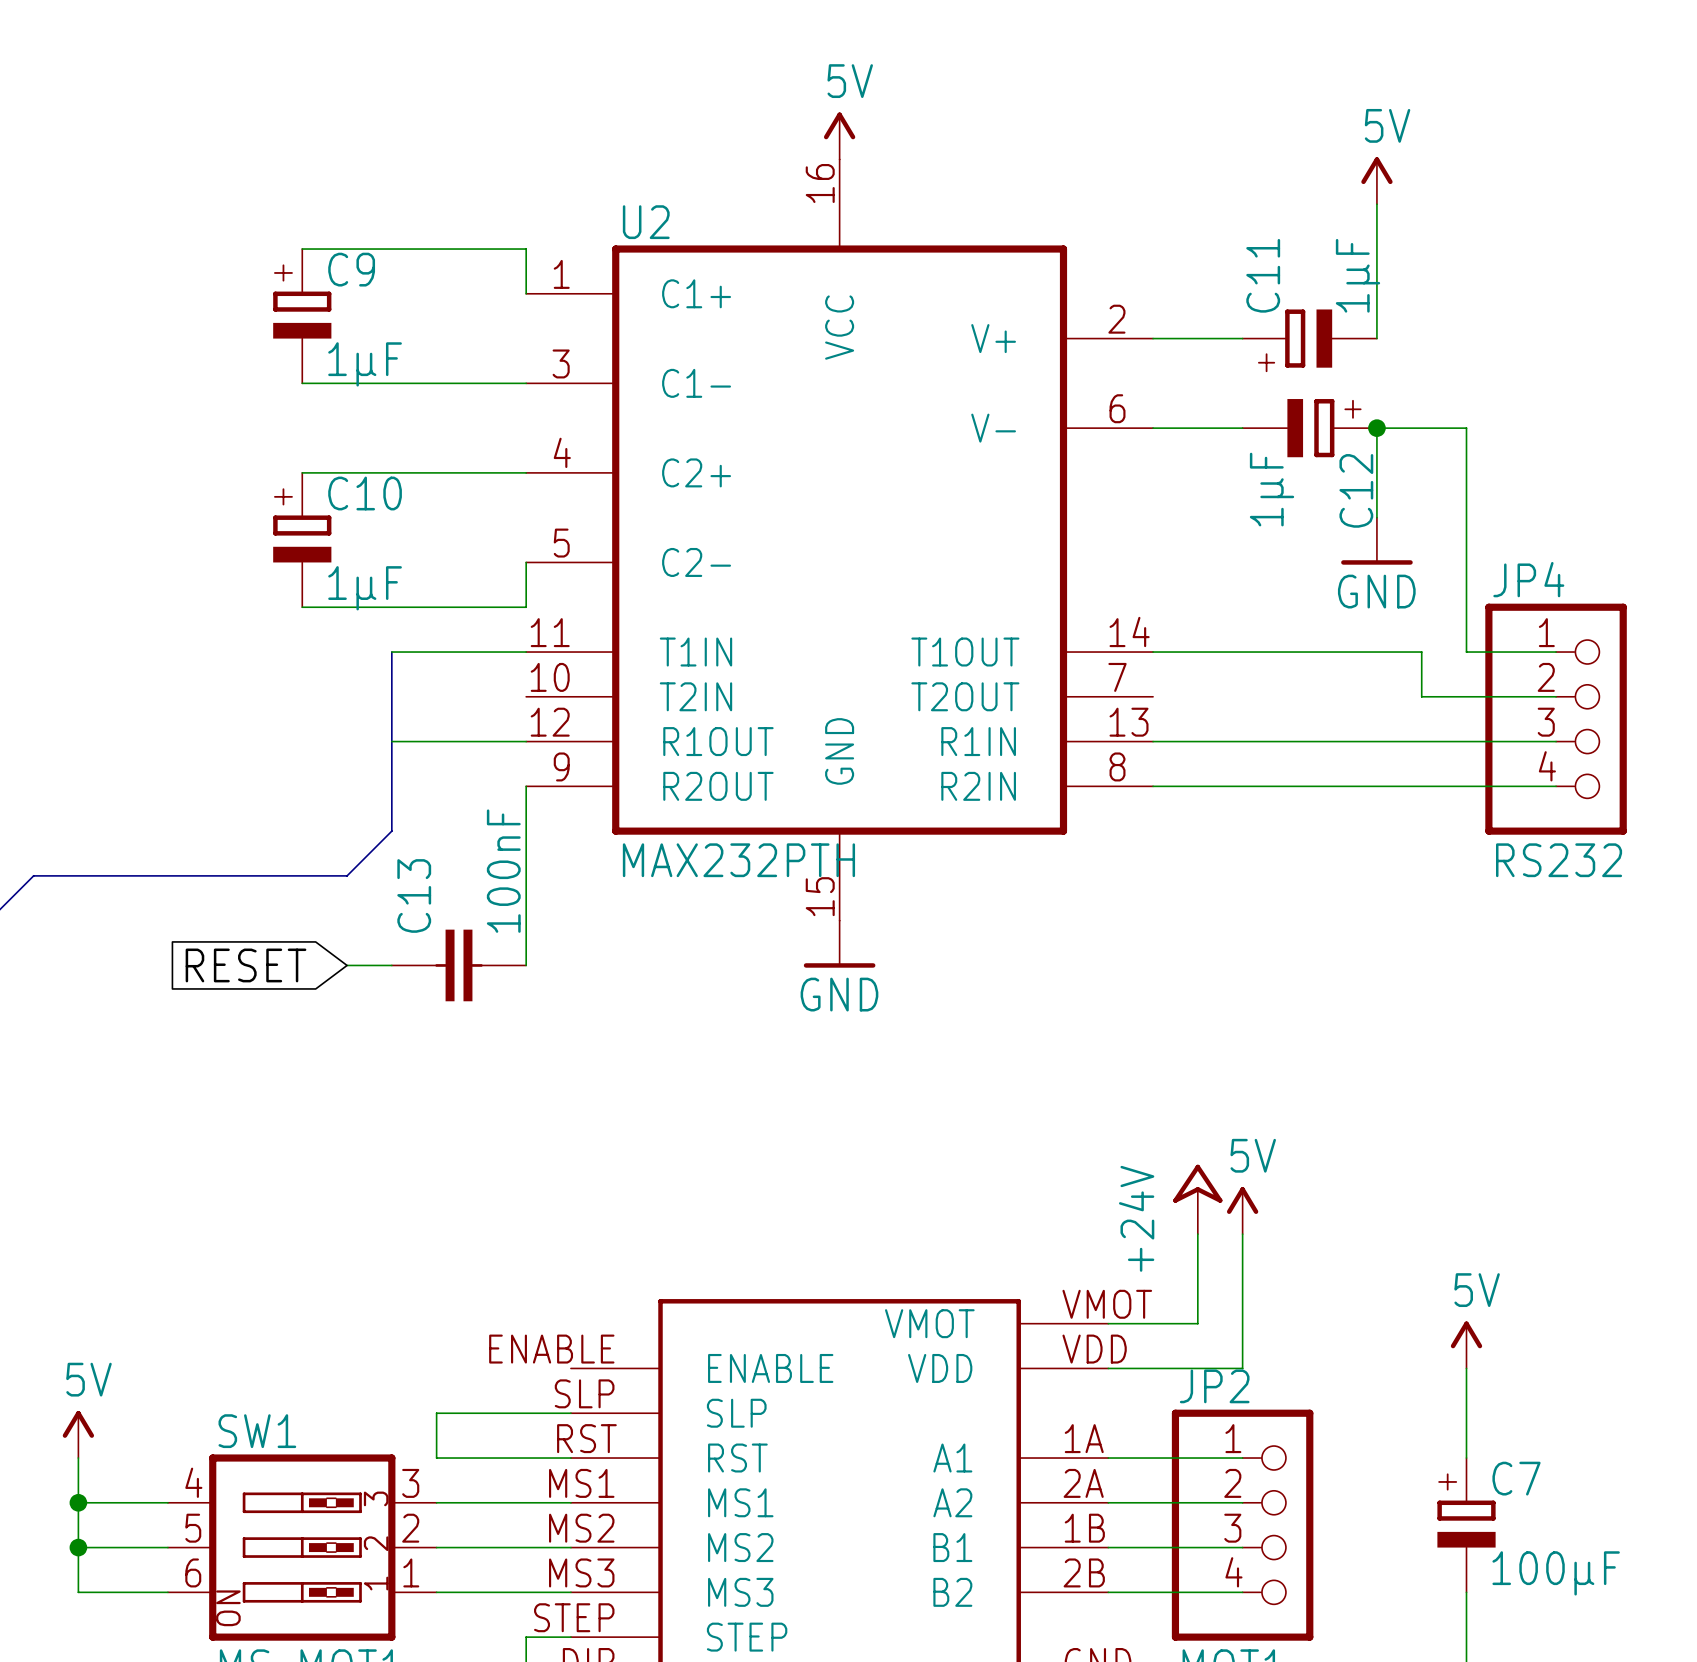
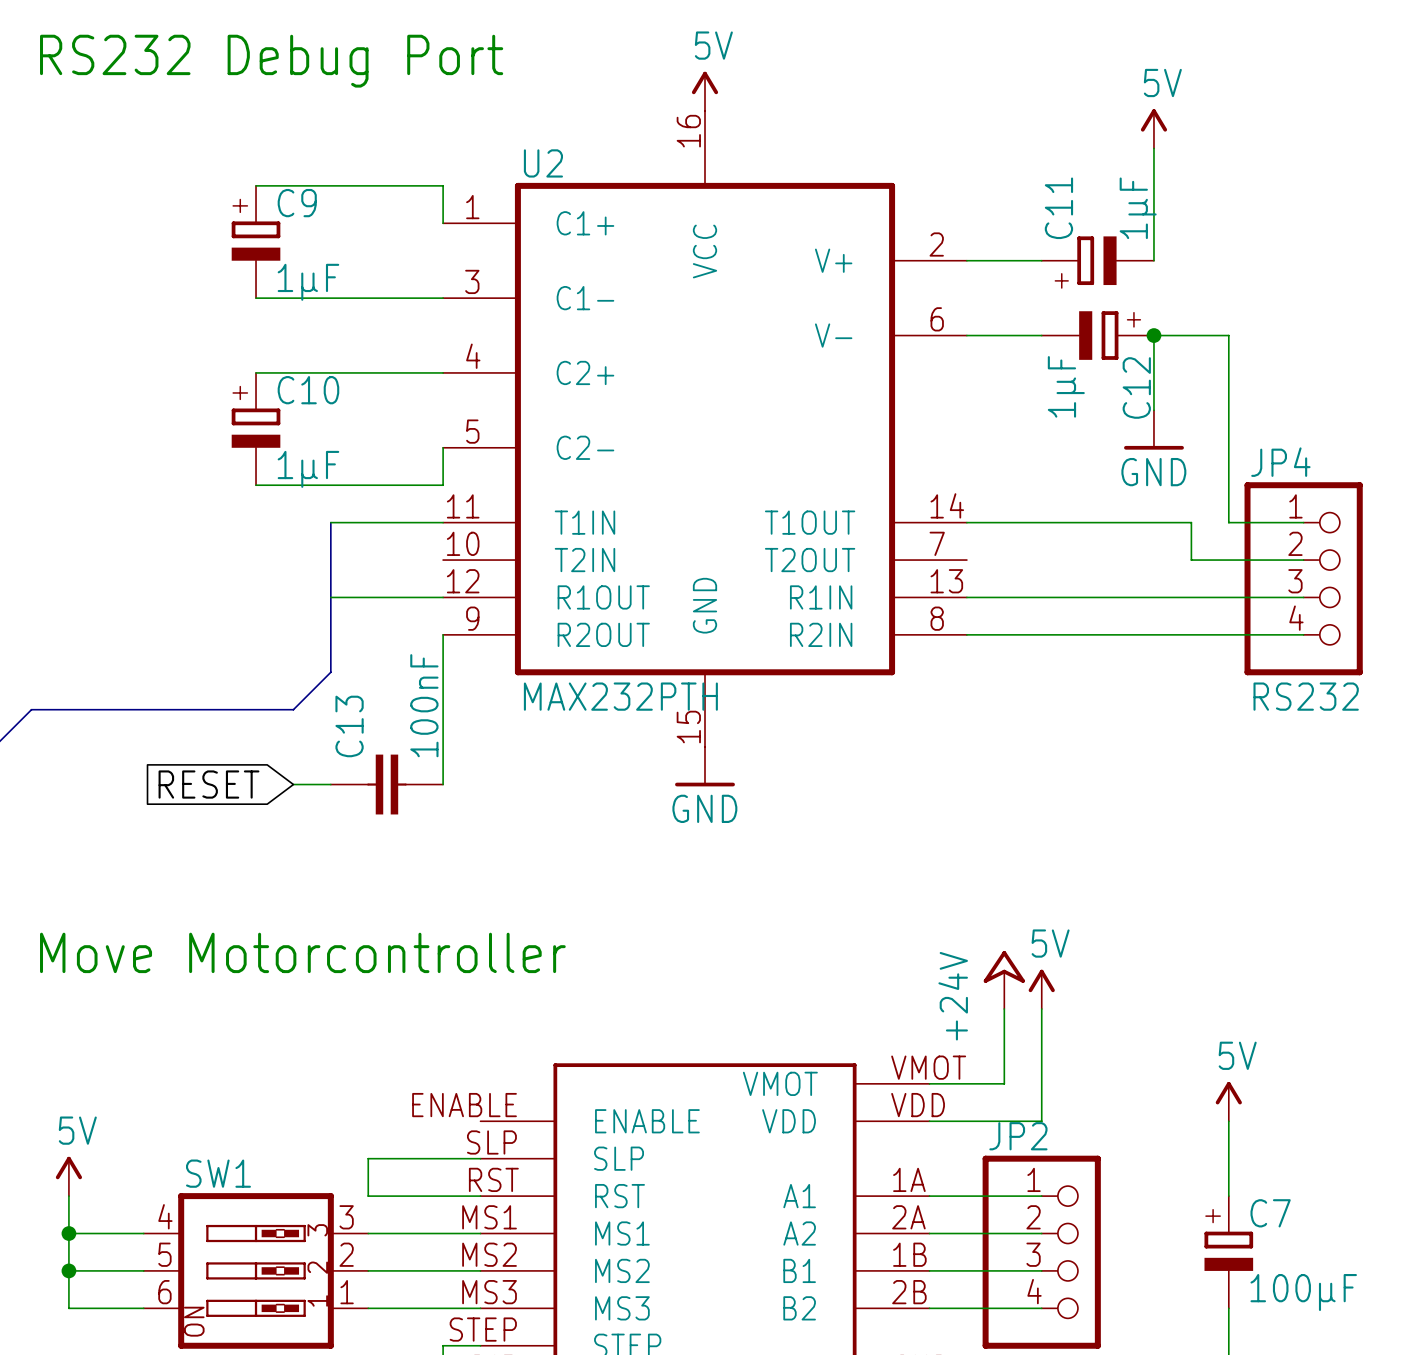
text: none -> RS232 Debug Port (271, 61)
text: none -> Move Motorcontroller (302, 952)

